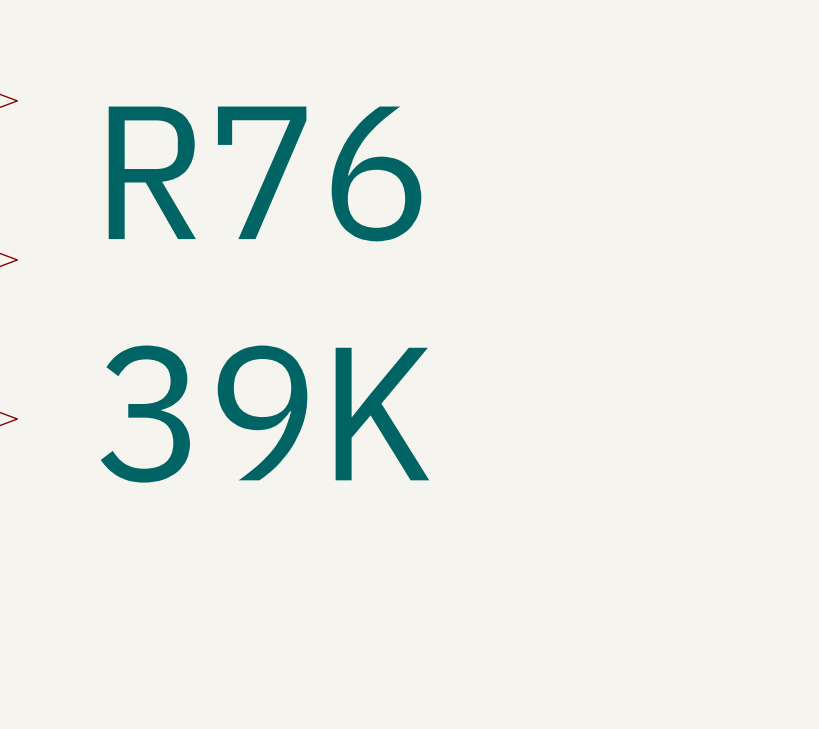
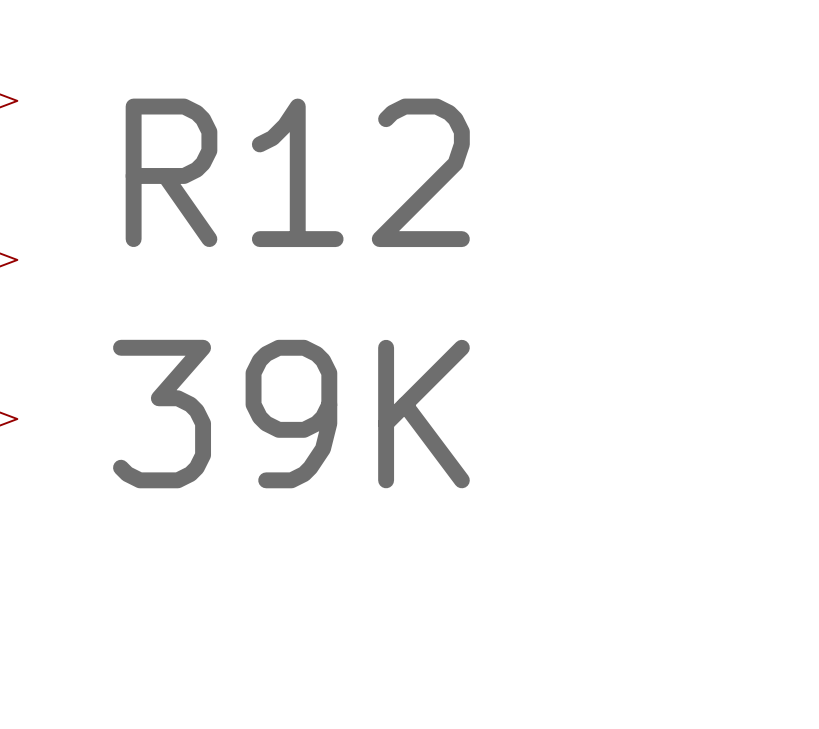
R76 name: R76 (264, 173) -> R12 (297, 172)

